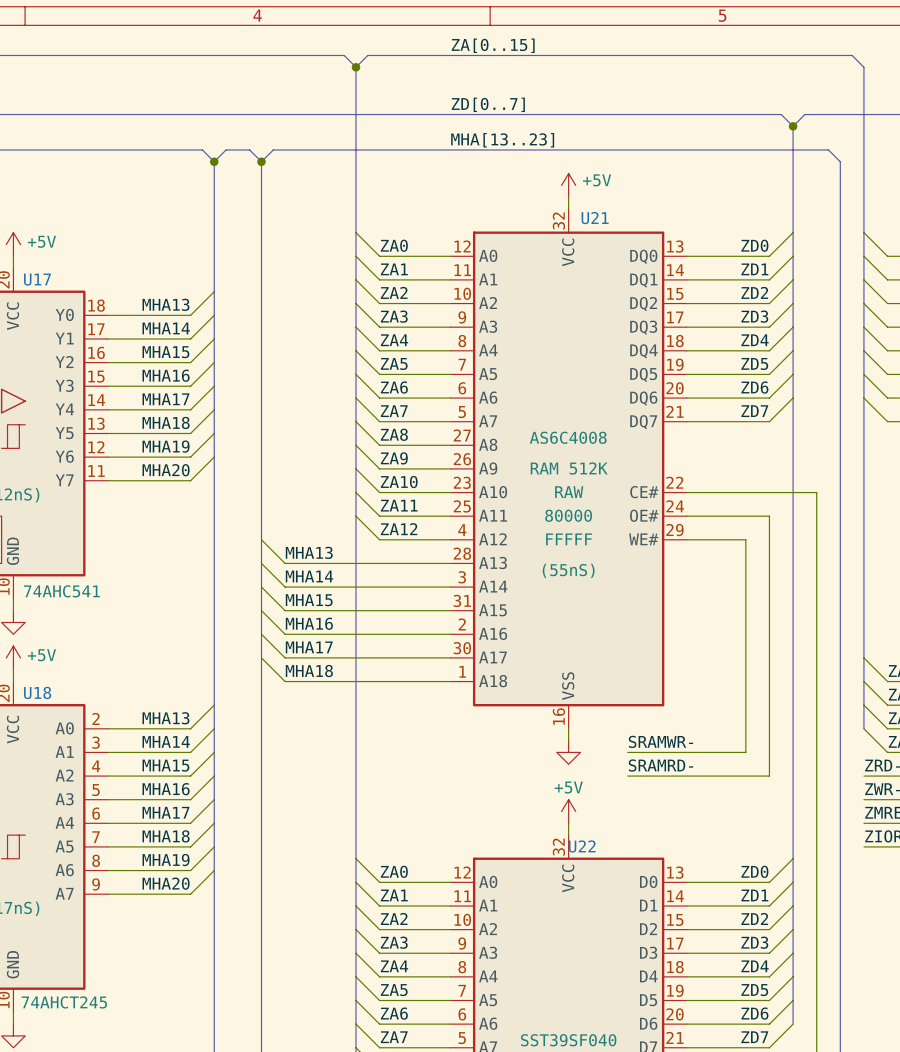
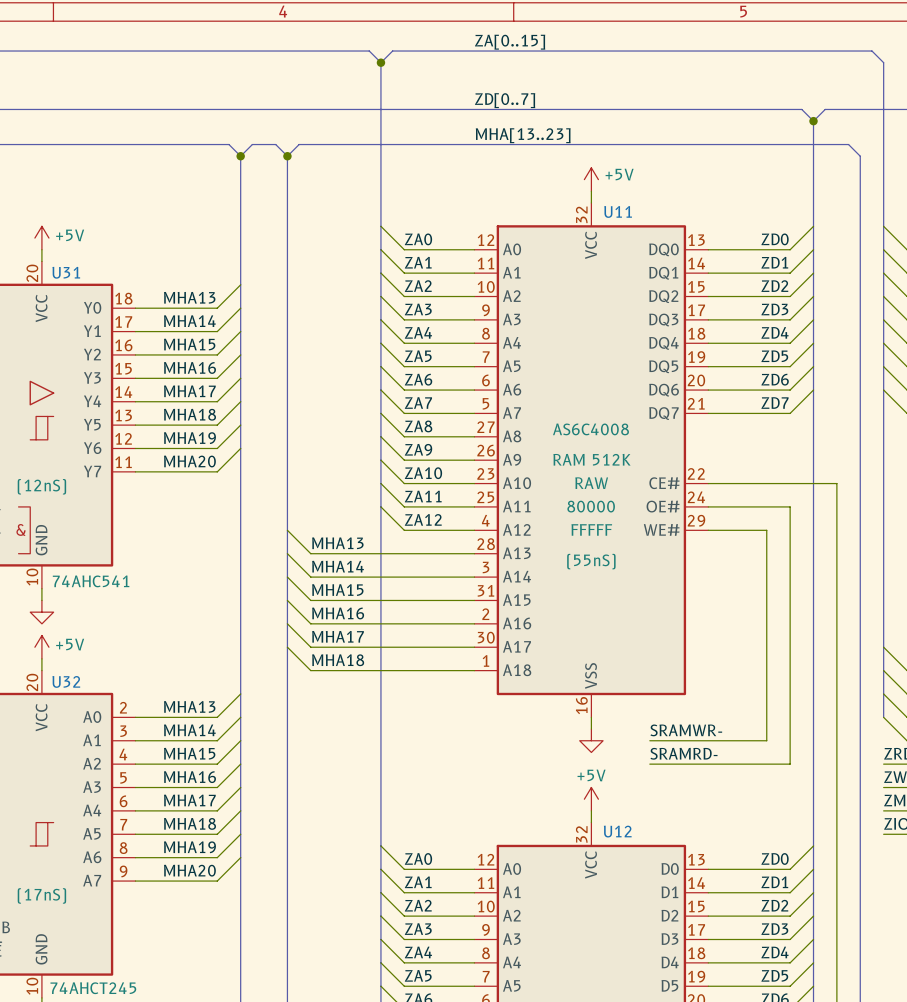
U21 name: U21 (595, 218) -> U11 (618, 211)
U17 name: U17 (37, 279) -> U31 (66, 272)
U18 name: U18 (37, 692) -> U32 (66, 681)
U22 name: U22 (582, 846) -> U12 (617, 831)

